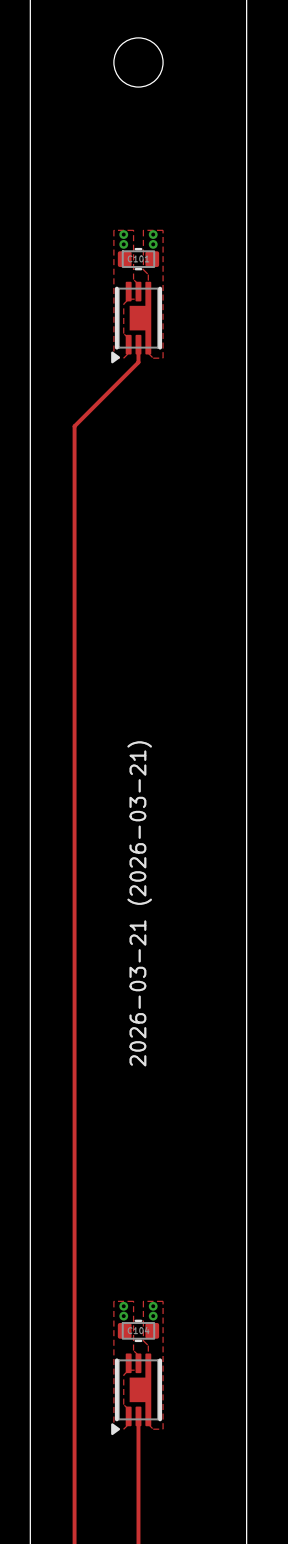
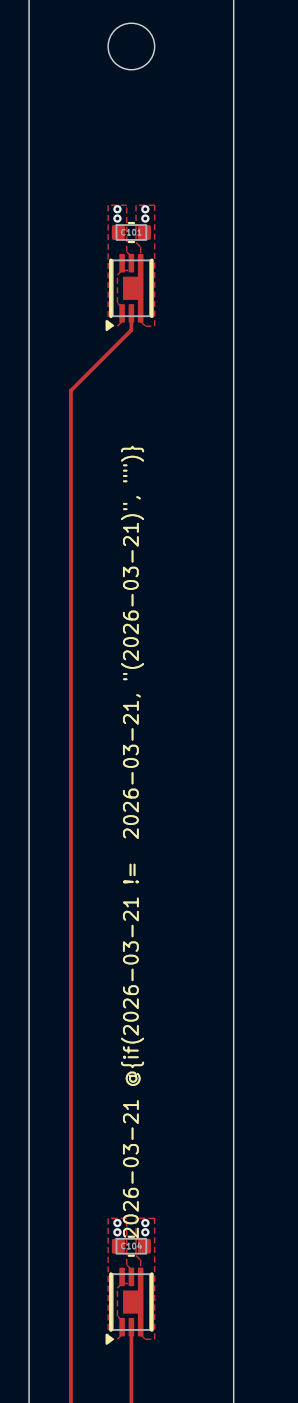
drawing shape: [127, 741, 152, 1067] -> [120, 445, 145, 1239]

